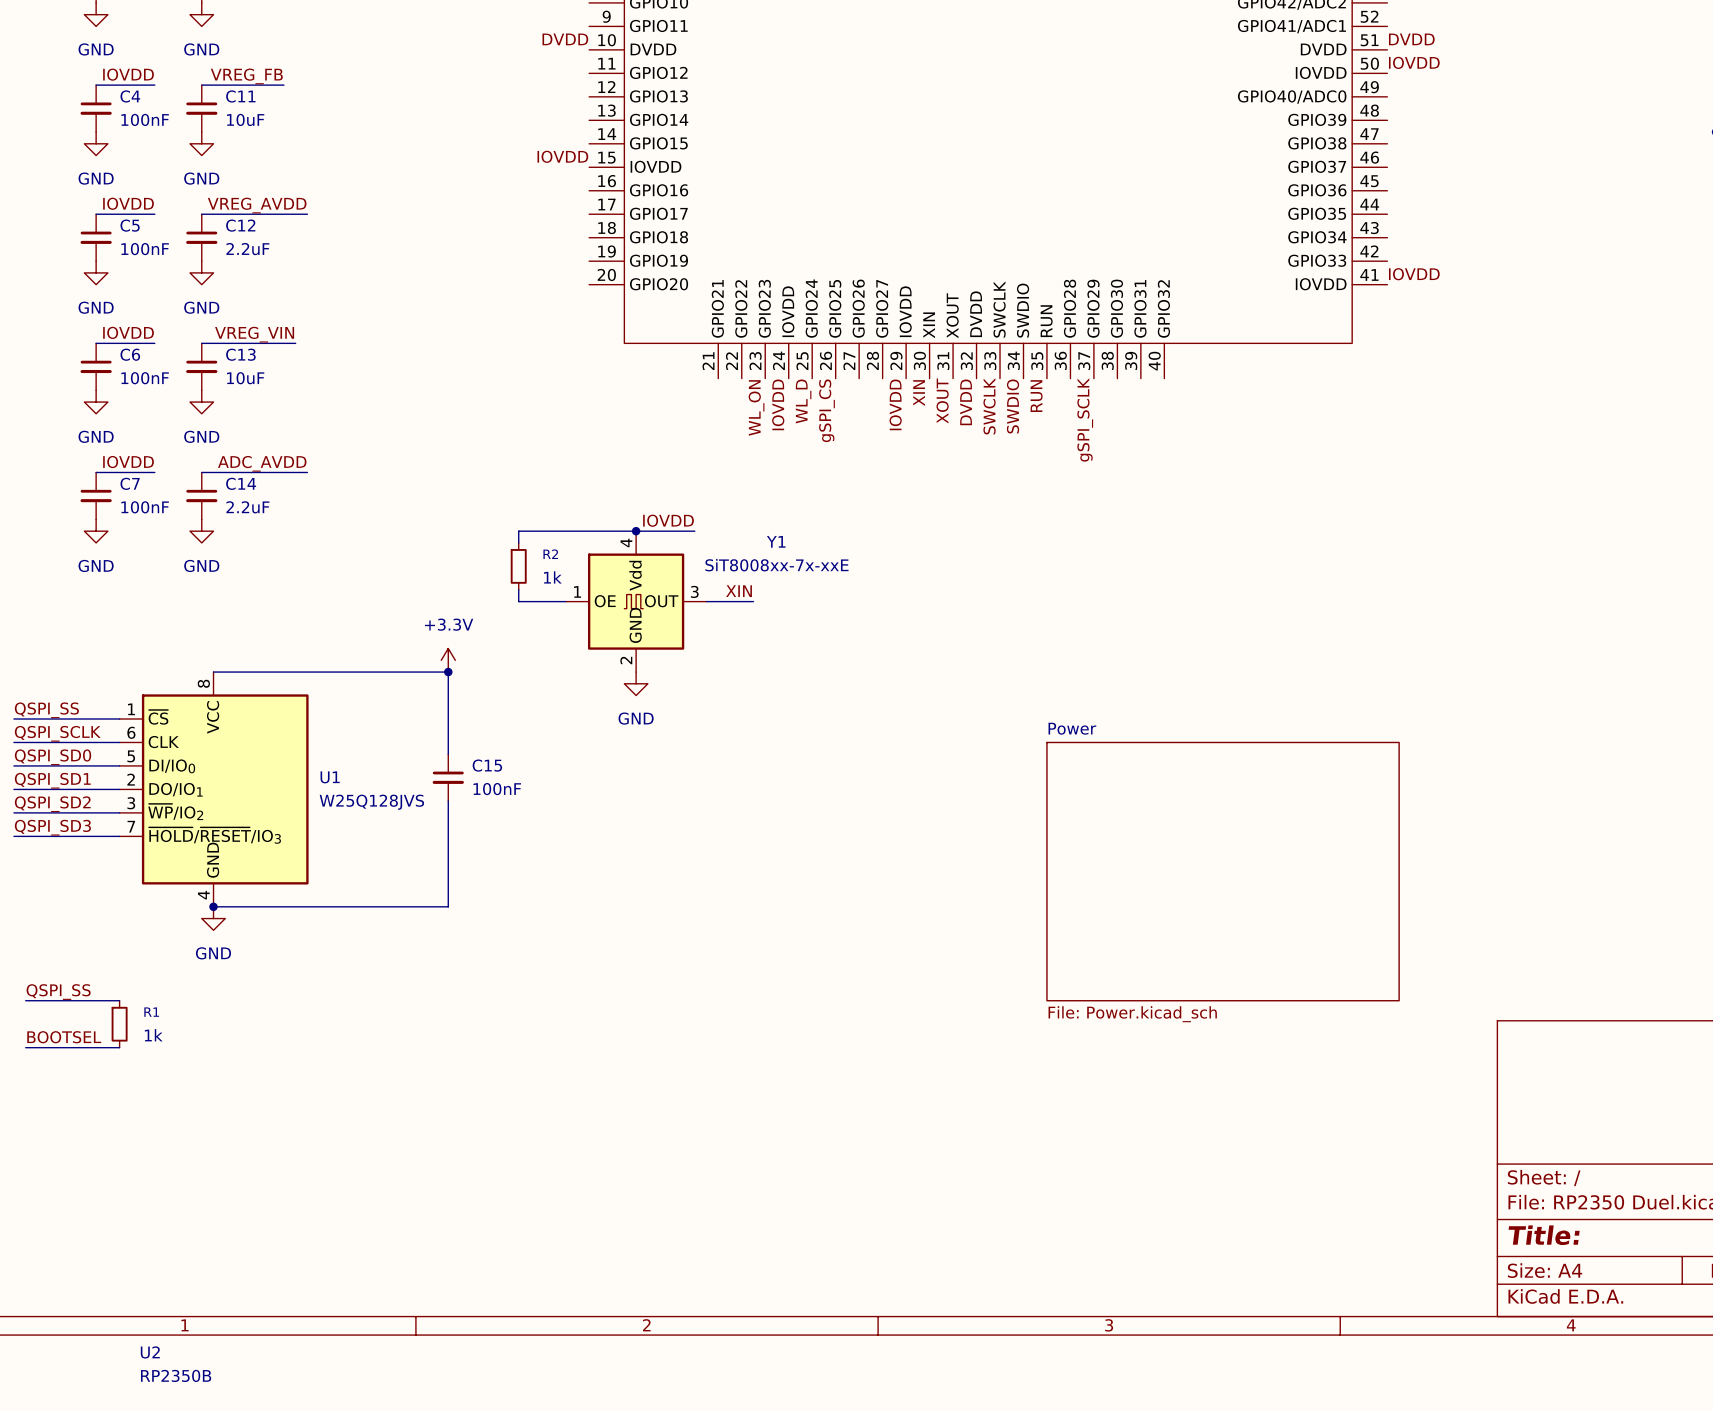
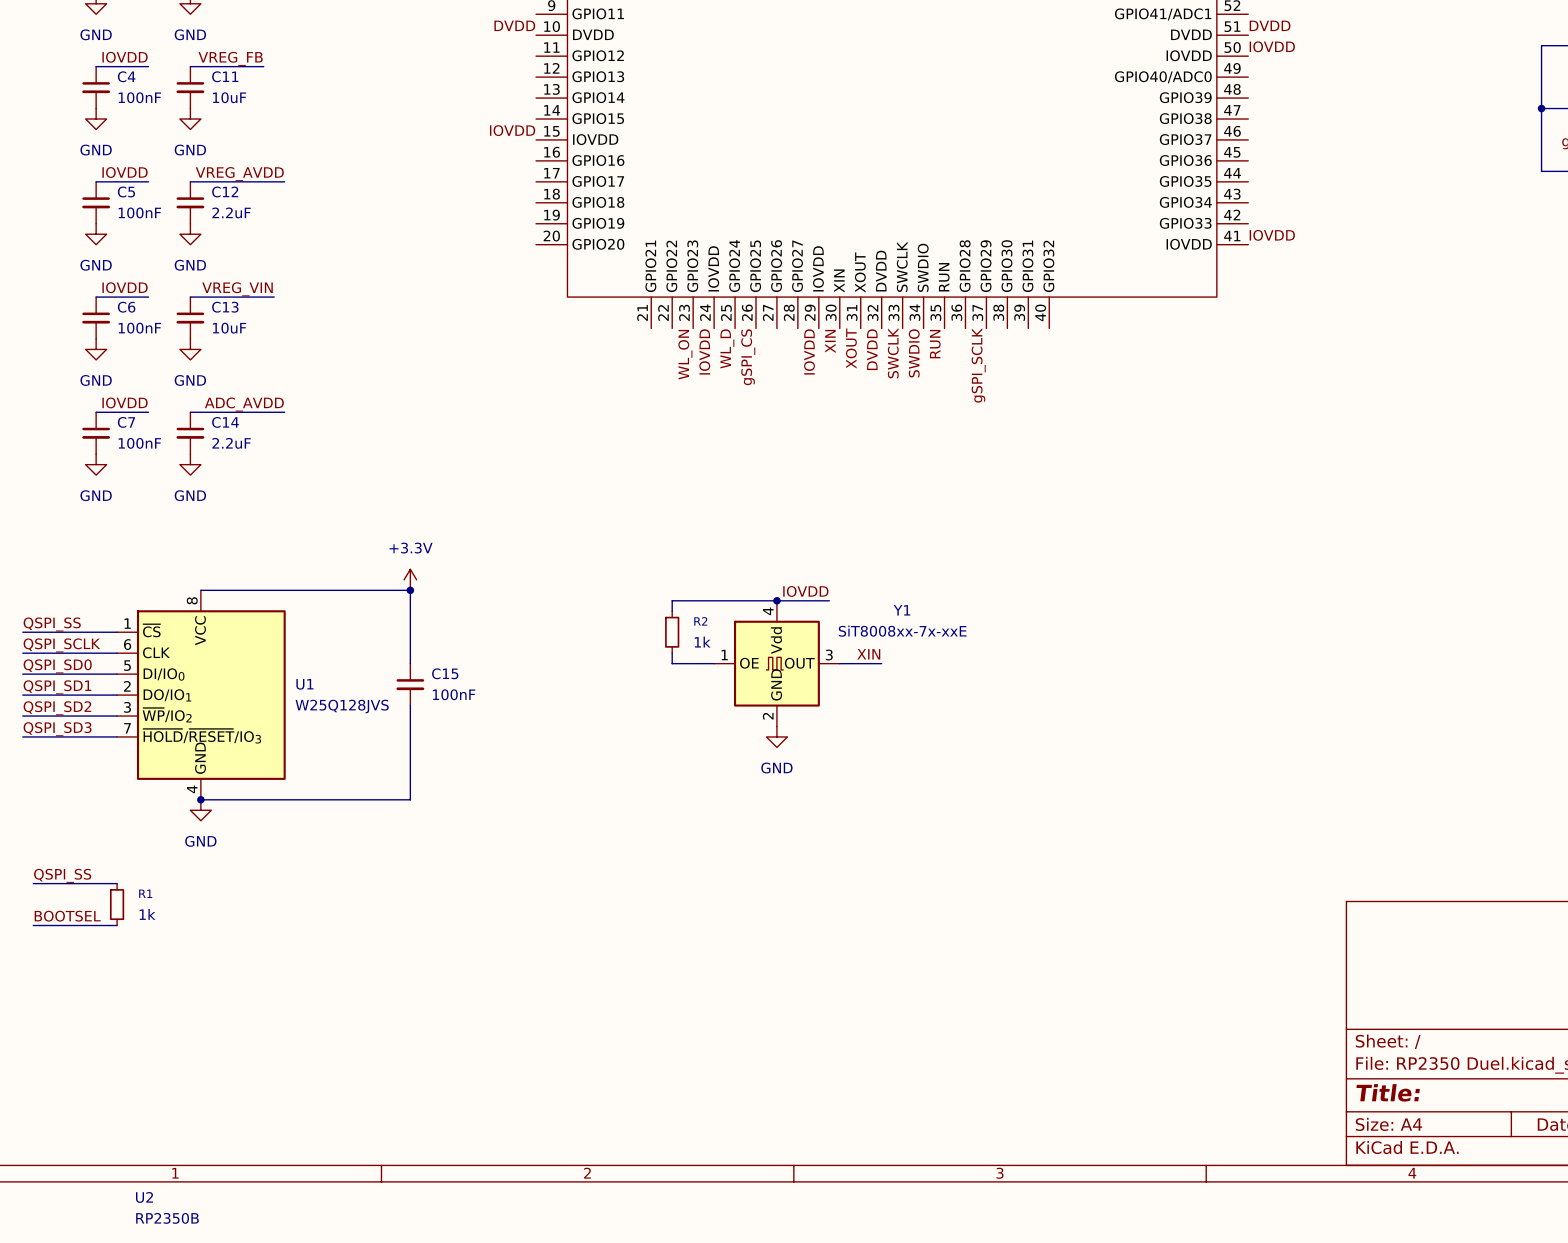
label: IOVDD (668, 520) -> none
junction: (636, 531) -> none
wire: (694, 531) (518, 531) (518, 542) -> none
R2 position: (518, 566) -> (672, 632)
wire: (518, 589) (518, 601) (565, 601) -> none
label: XIN (739, 591) -> none
Y1 position: (636, 601) -> (776, 663)
wire: (706, 601) (753, 601) -> none
label: none -> IOVDD (805, 591)
power symbol: GND (636, 683) -> none
junction: none -> (776, 600)
wire: none -> (829, 600) (672, 600) (672, 611)
wire: none -> (672, 653) (672, 663) (714, 663)
label: none -> XIN (868, 654)
wire: none -> (839, 663) (881, 663)
power symbol: none -> GND (776, 736)
sheet Power: File: Power.kicad_sch (1223, 871) -> none

